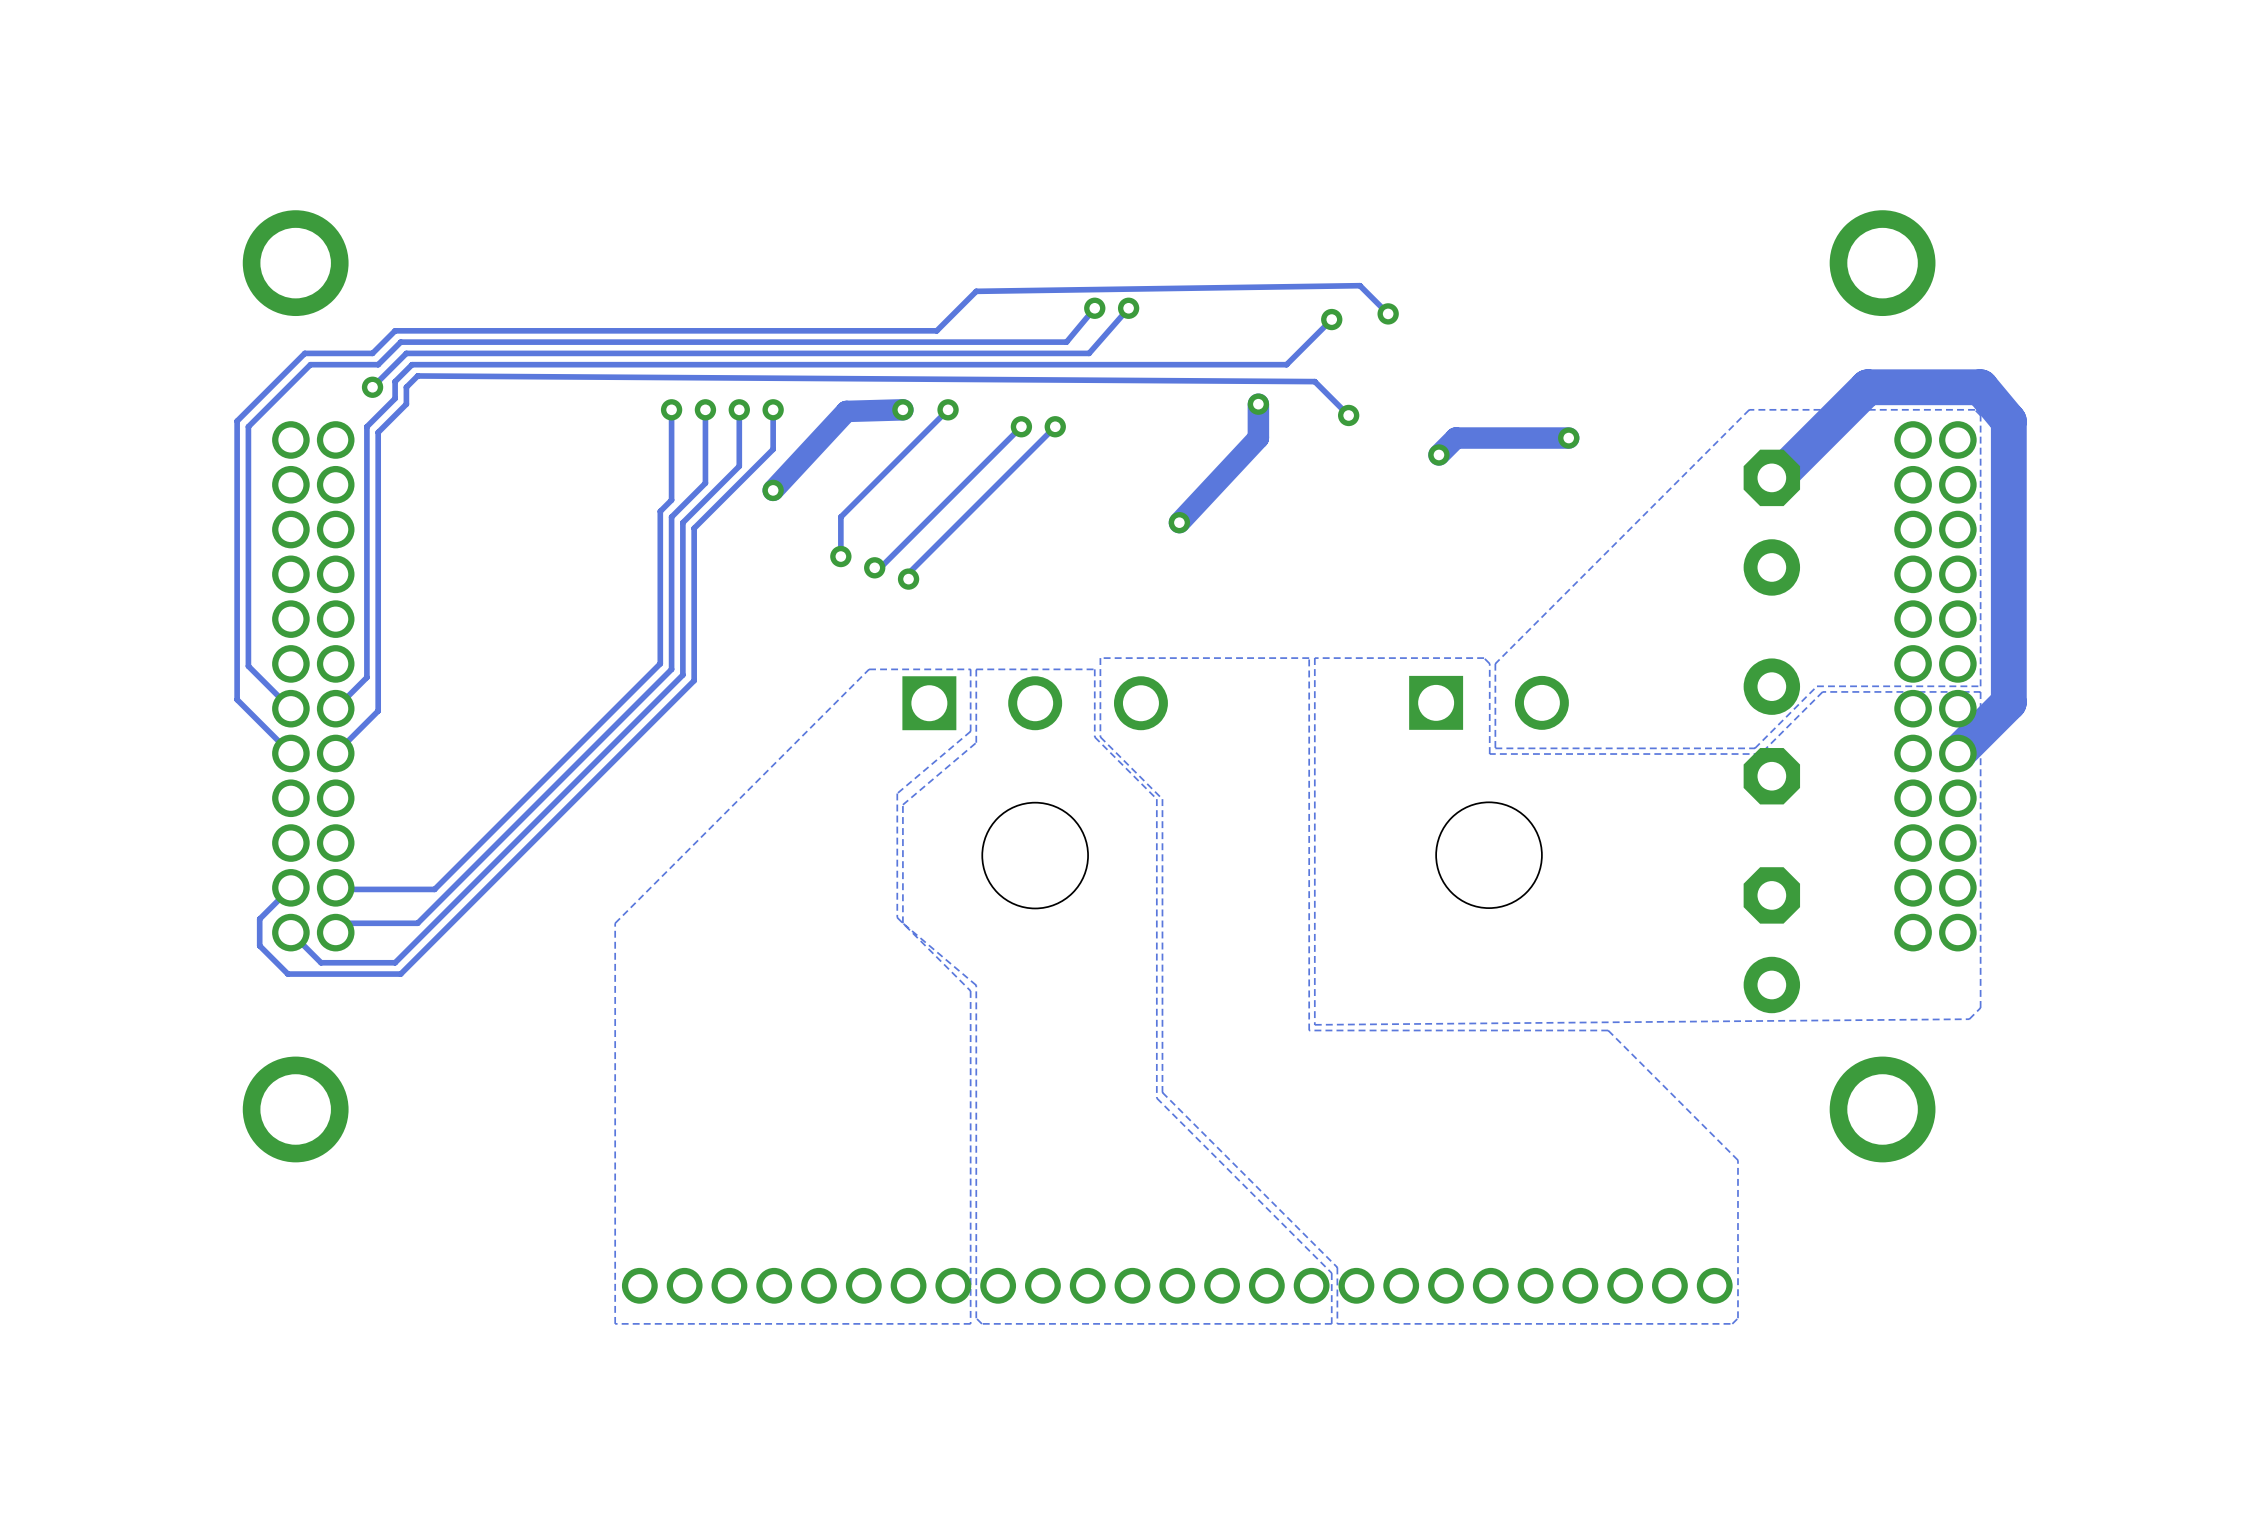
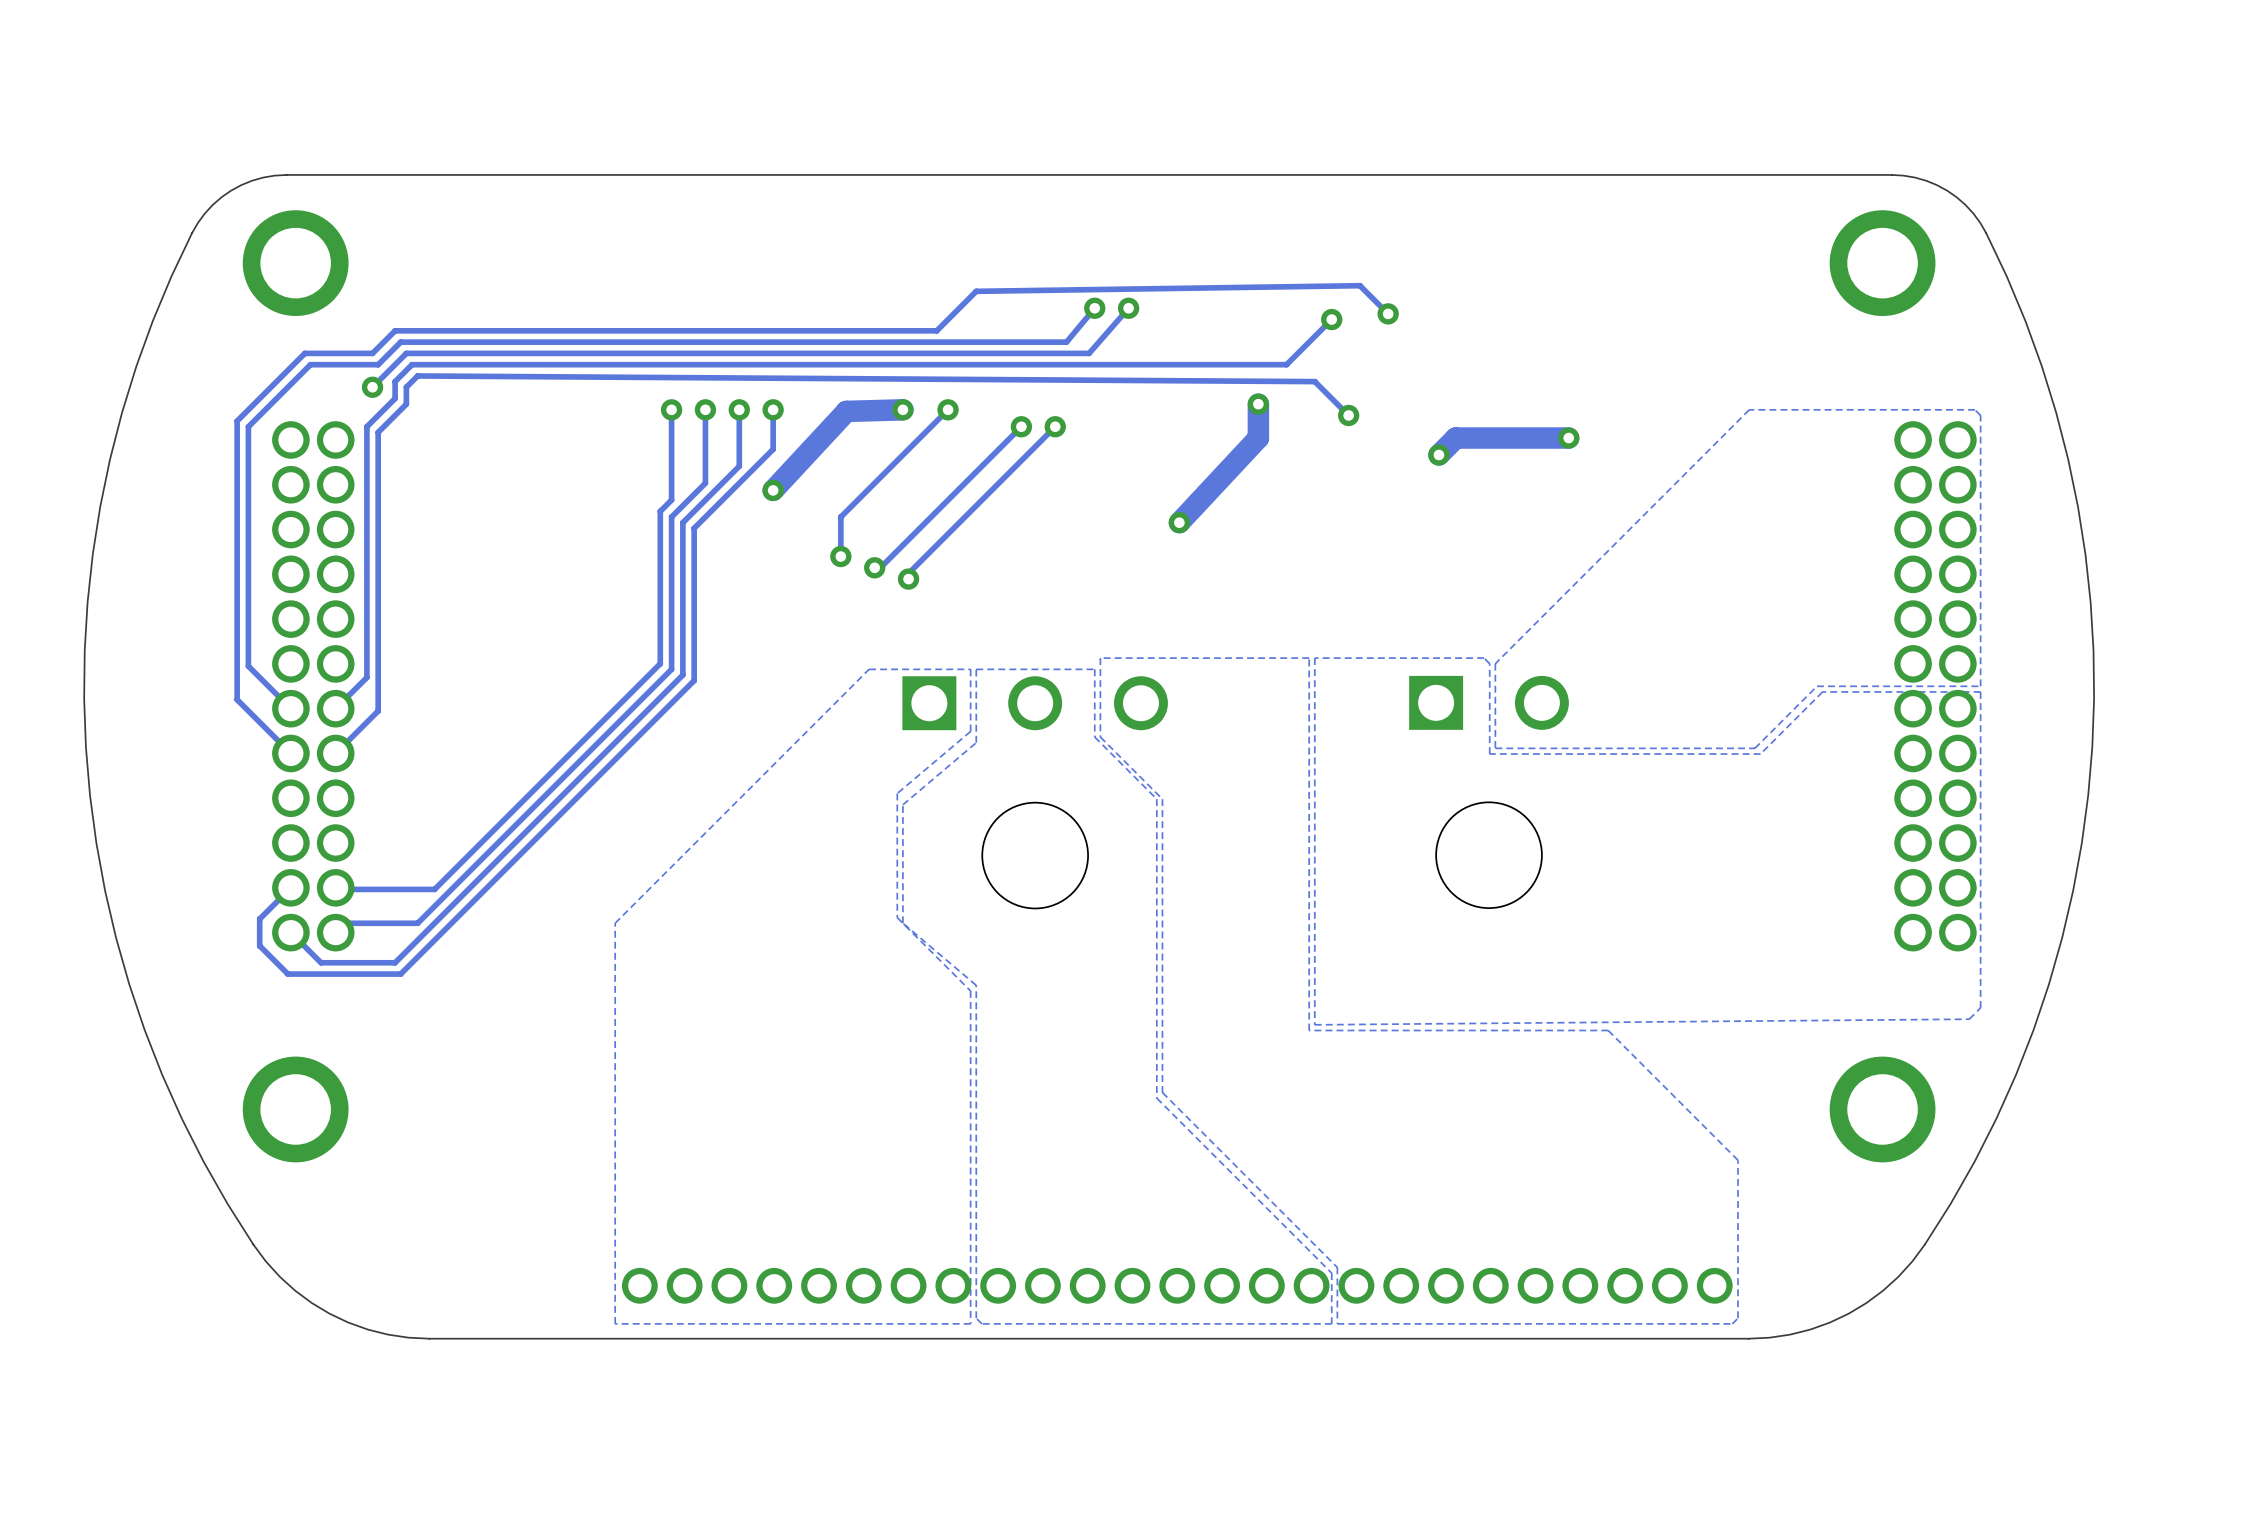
line: none -> (1891, 174) (286, 174) (252, 180) (231, 190) (204, 213) (192, 233) (152, 321) (122, 412) (100, 506) (92, 554) (87, 602) (84, 698) (85, 747) (96, 843) (116, 937) (129, 984) (162, 1074) (181, 1118) (227, 1203) (253, 1244) (279, 1276) (311, 1303) (329, 1313) (348, 1322) (388, 1334) (429, 1338) (1748, 1338) (1790, 1334) (1810, 1329) (1829, 1322) (1866, 1303) (1898, 1276) (1912, 1261) (1950, 1203) (1996, 1118) (2033, 1029) (2062, 937) (2081, 843) (2092, 747) (2094, 698) (2090, 602) (2077, 506) (2056, 412) (2025, 321) (1986, 233) (1973, 213) (1956, 197) (1936, 185) (1914, 177) (1891, 174)
track: (1771, 477) (1777, 477) (1867, 387) (1980, 387) (2008, 421) (2008, 702) (1957, 753) -> none
part: (1771, 522) -> none
part: (1771, 731) -> none
part: (1771, 940) -> none

